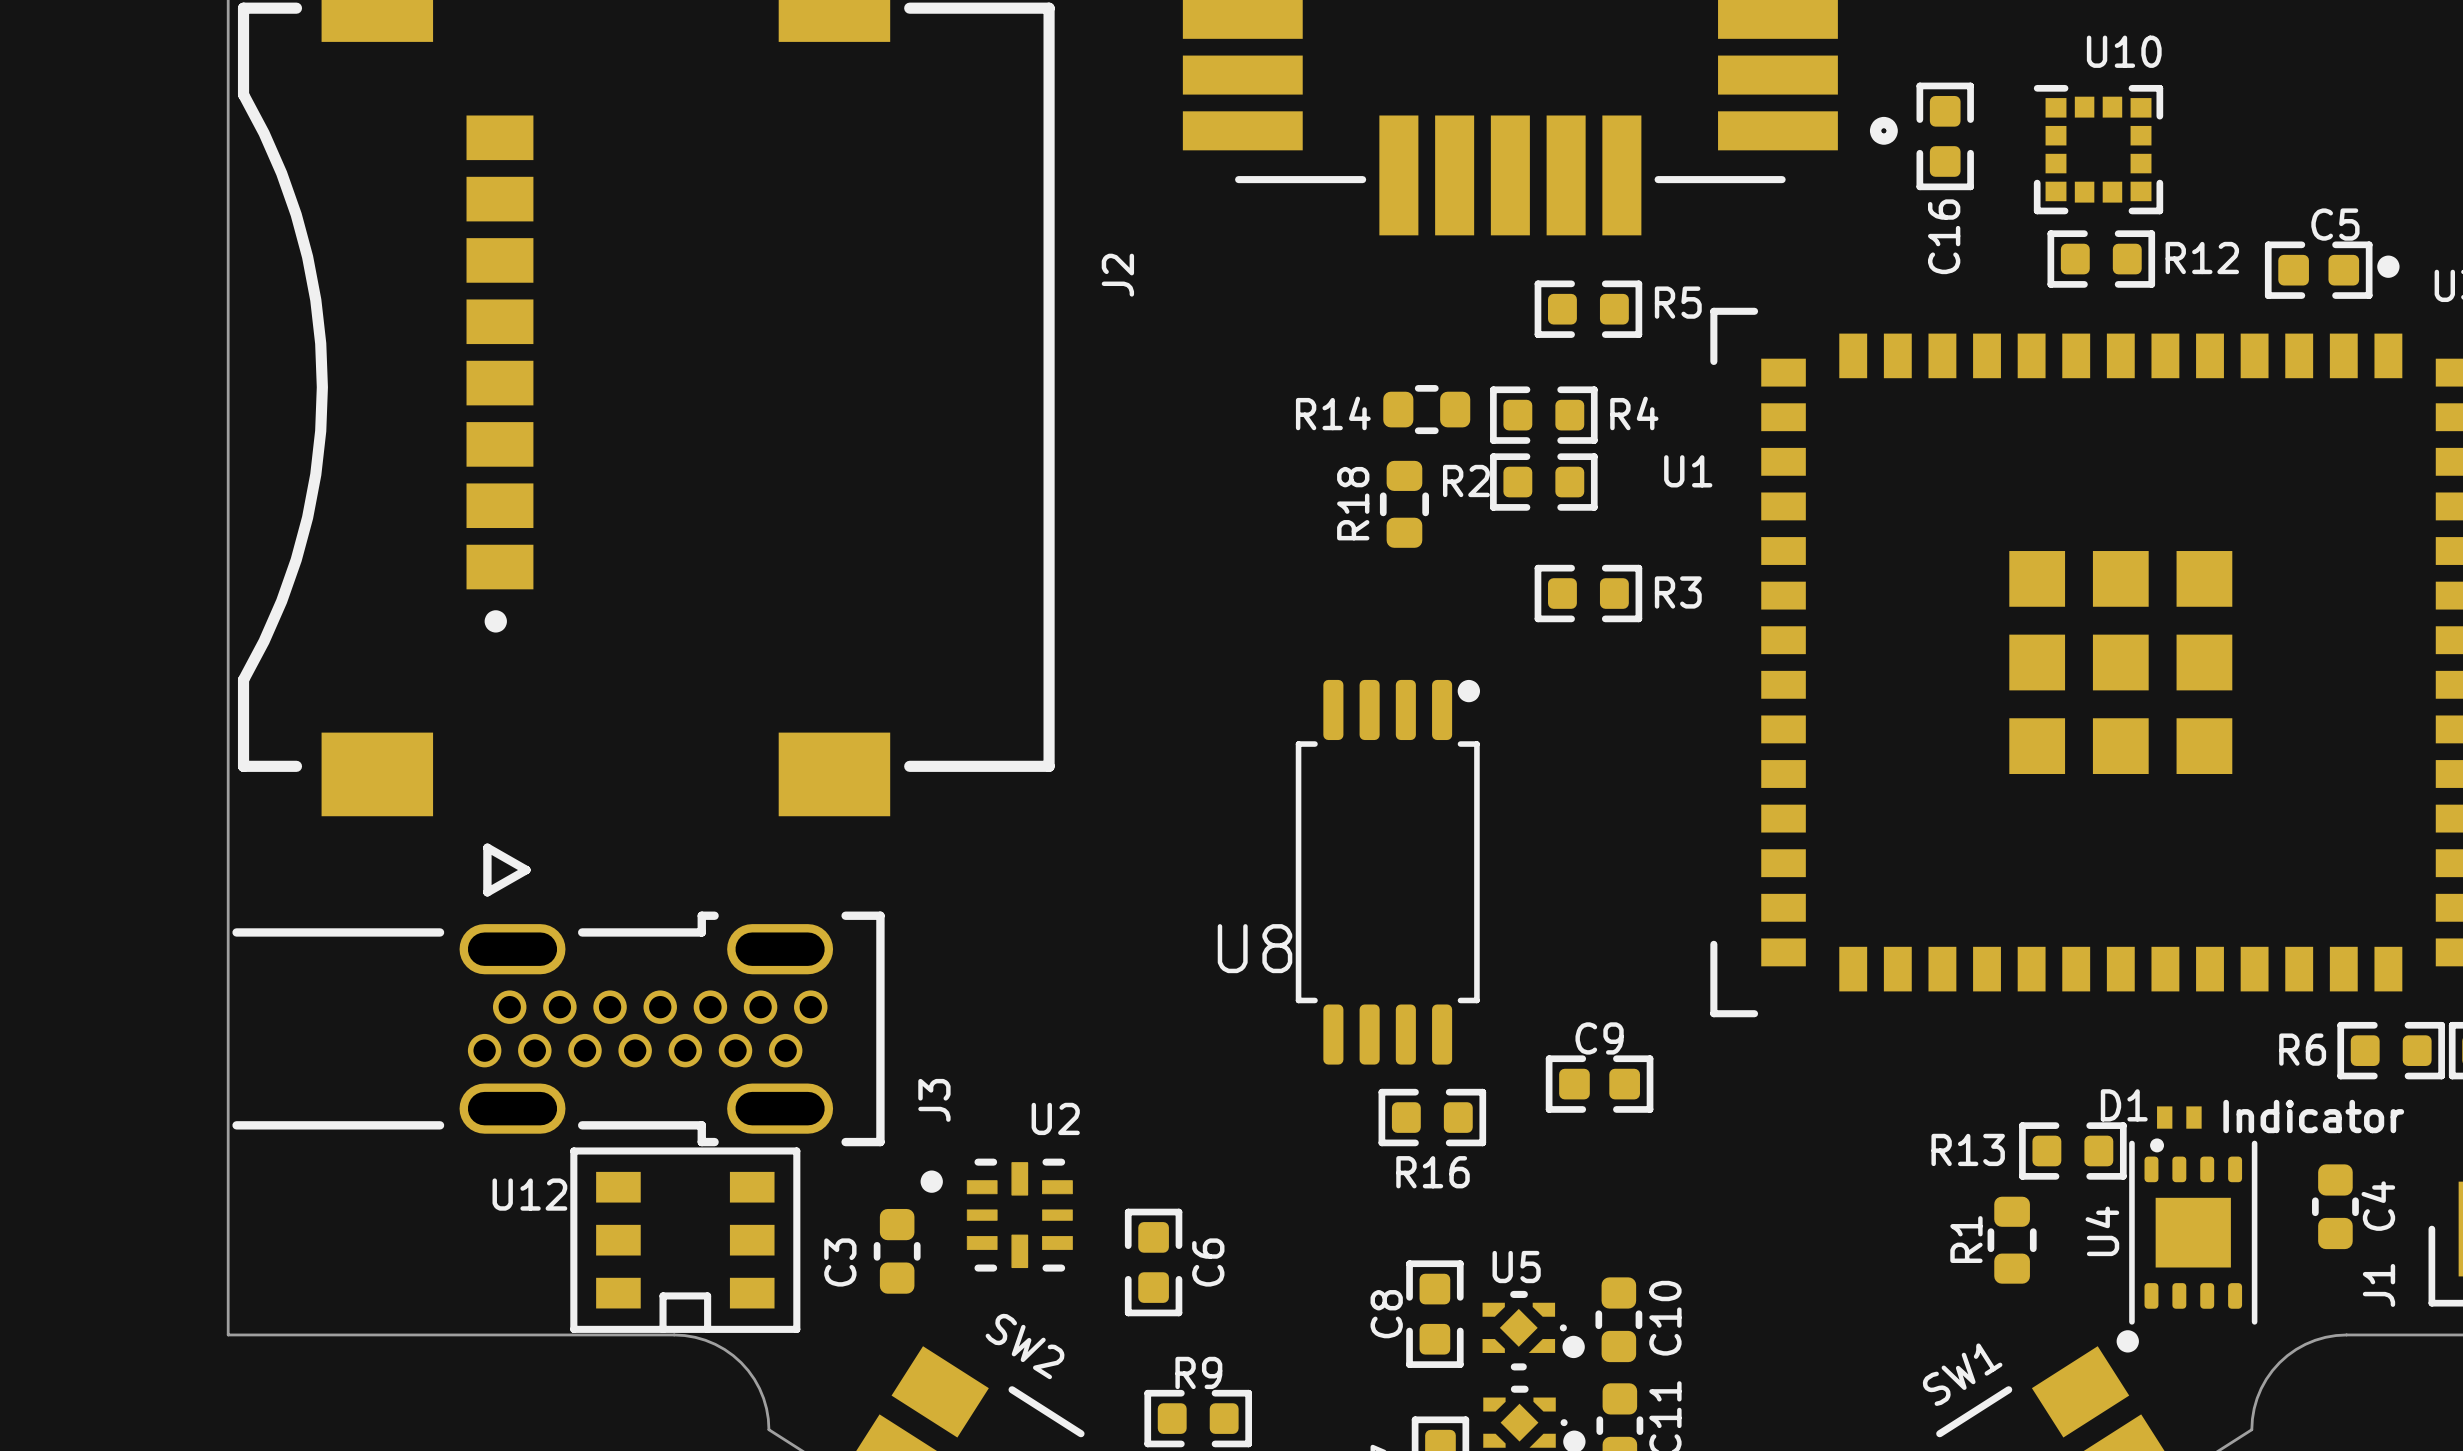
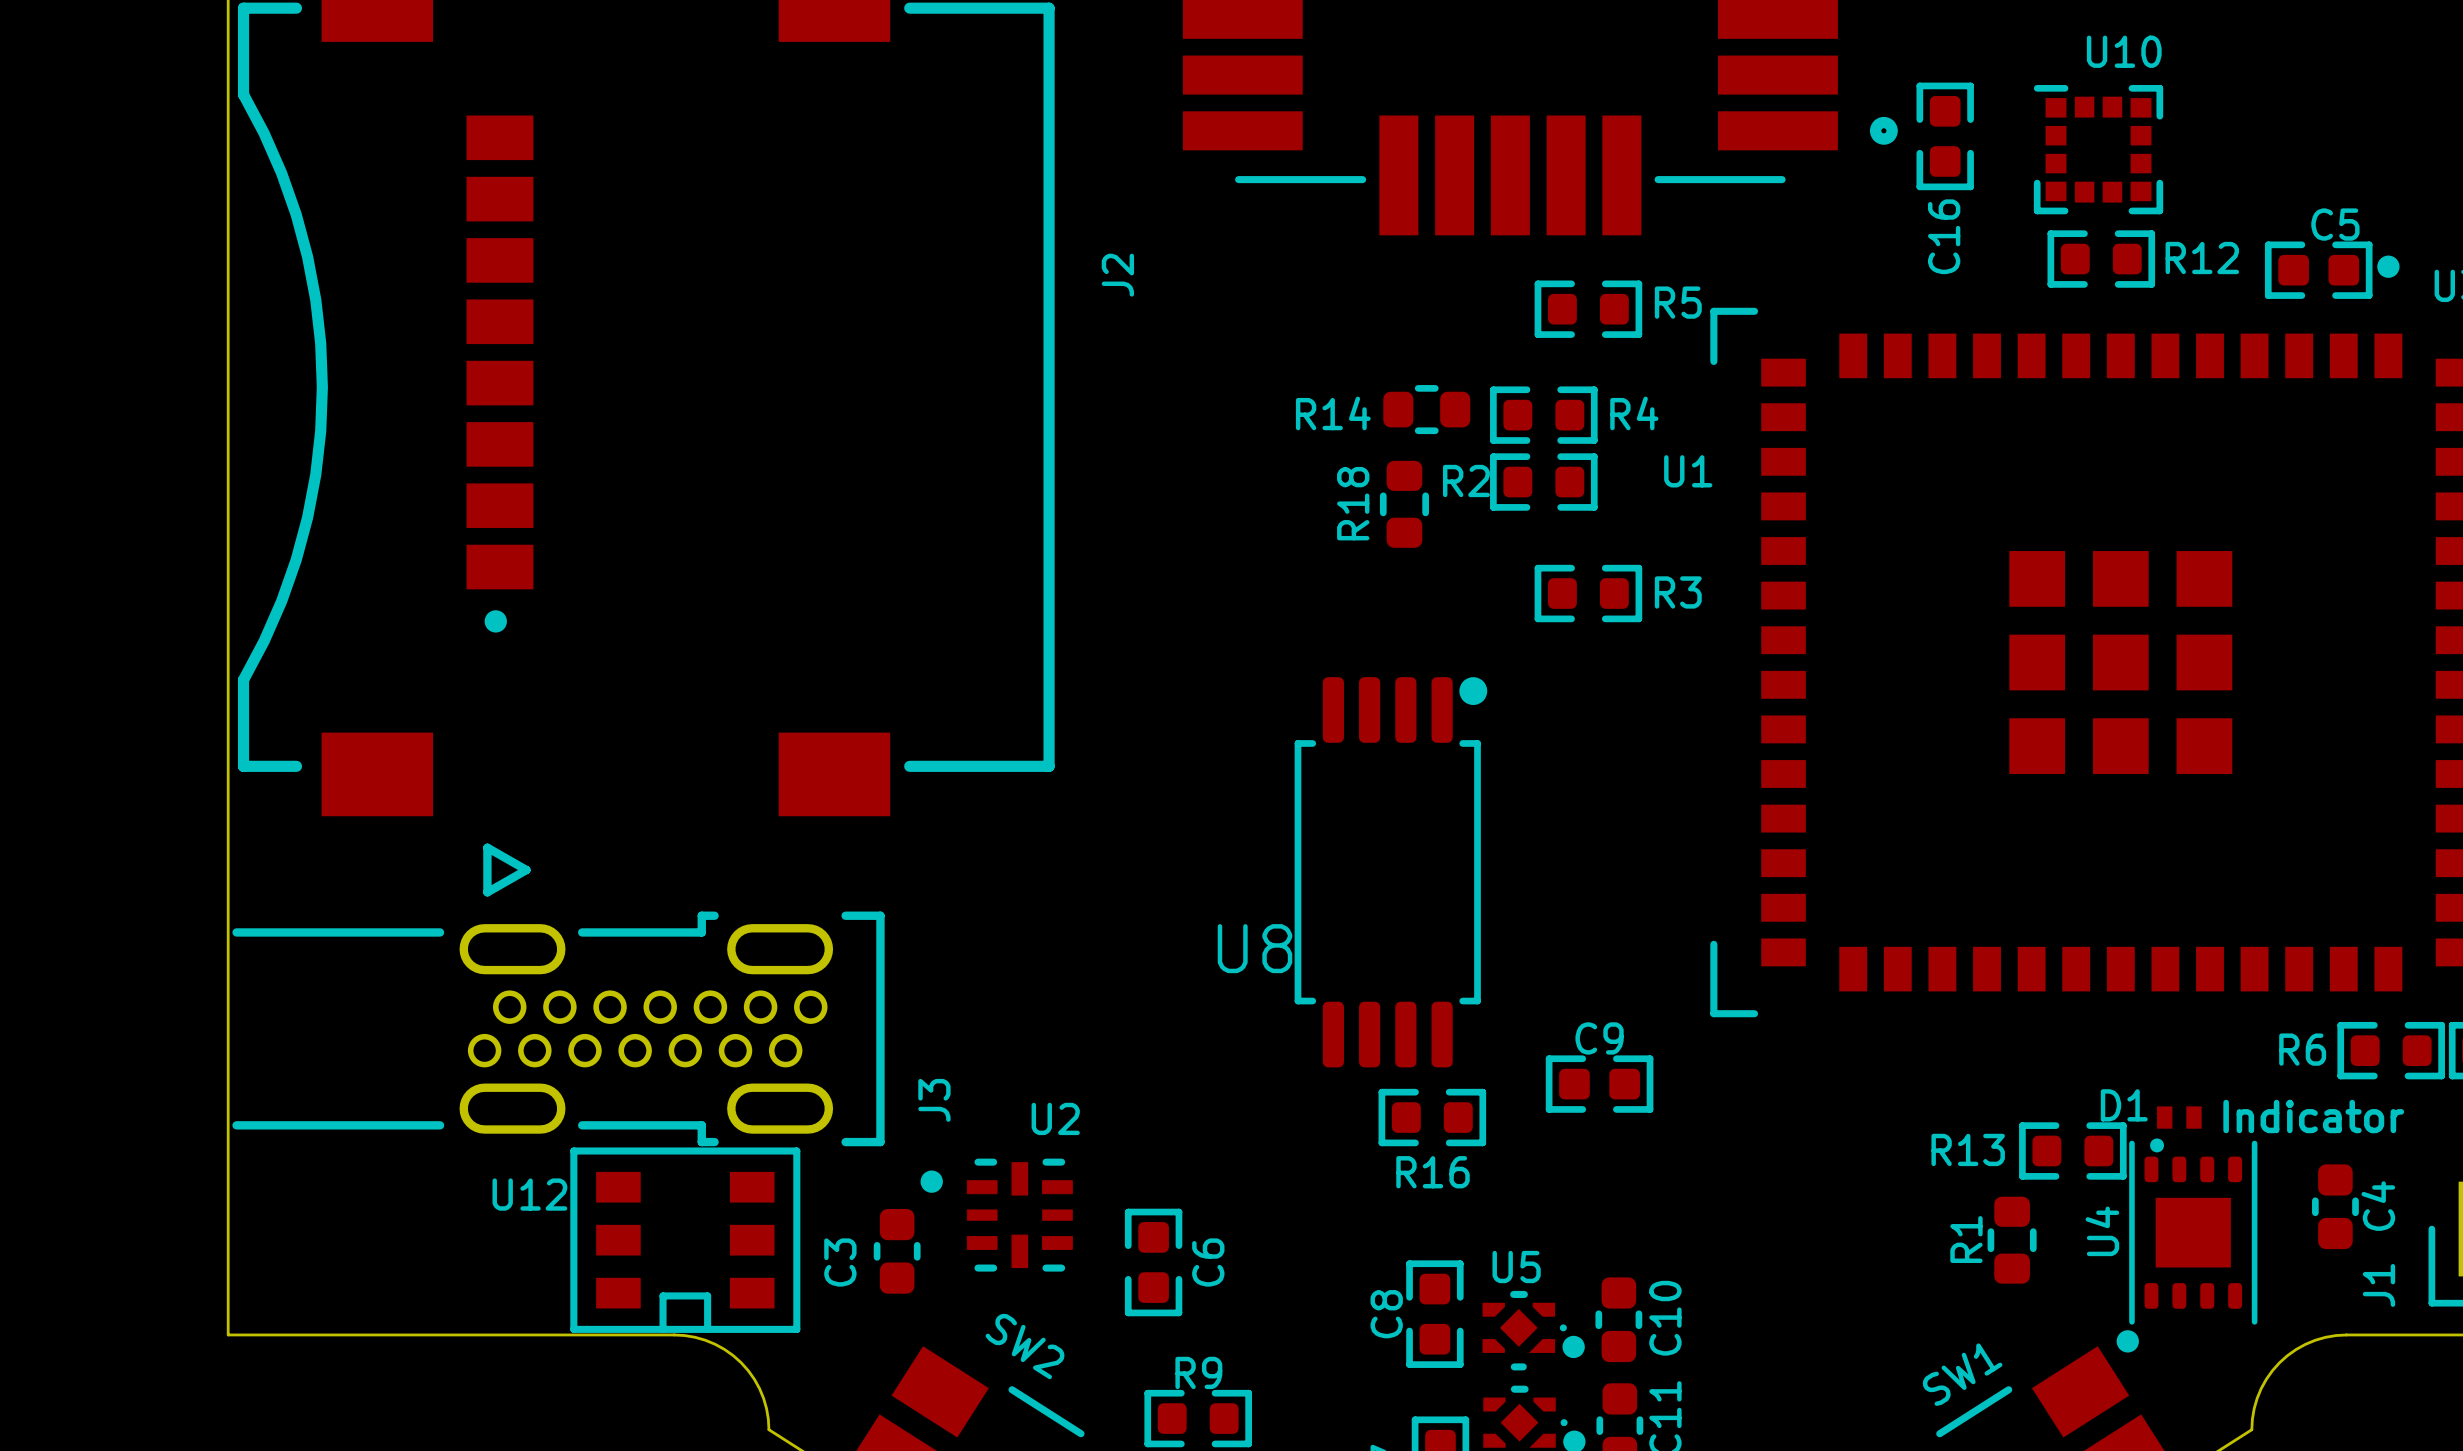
U8 footprint: [1295, 679, 1481, 1065] -> [1294, 677, 1488, 1068]

